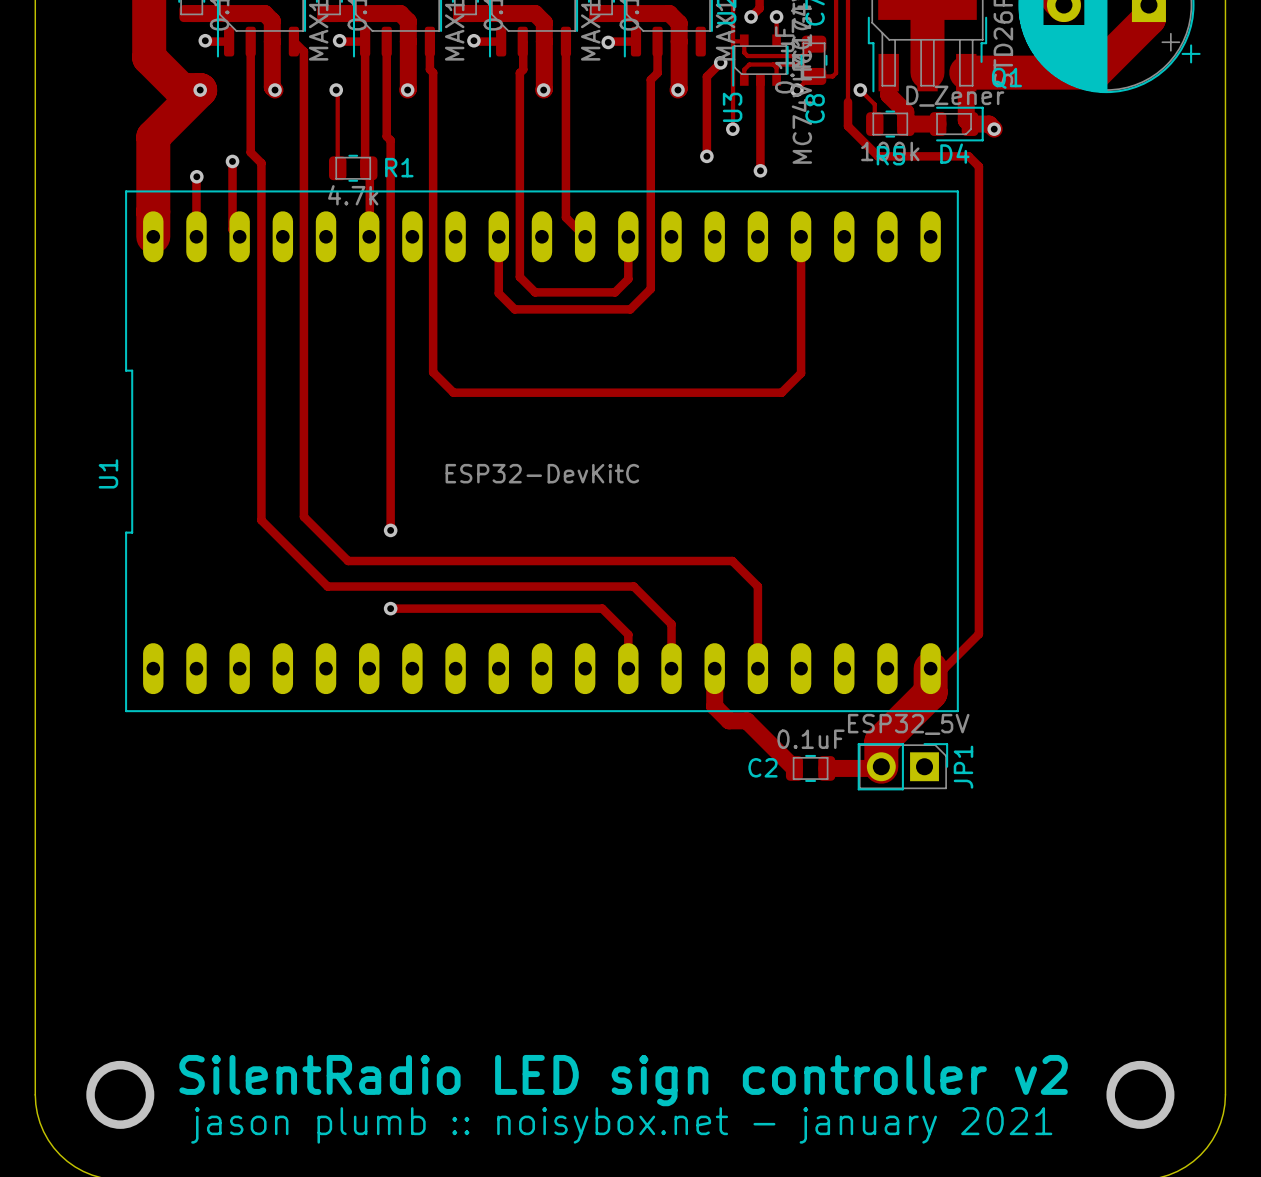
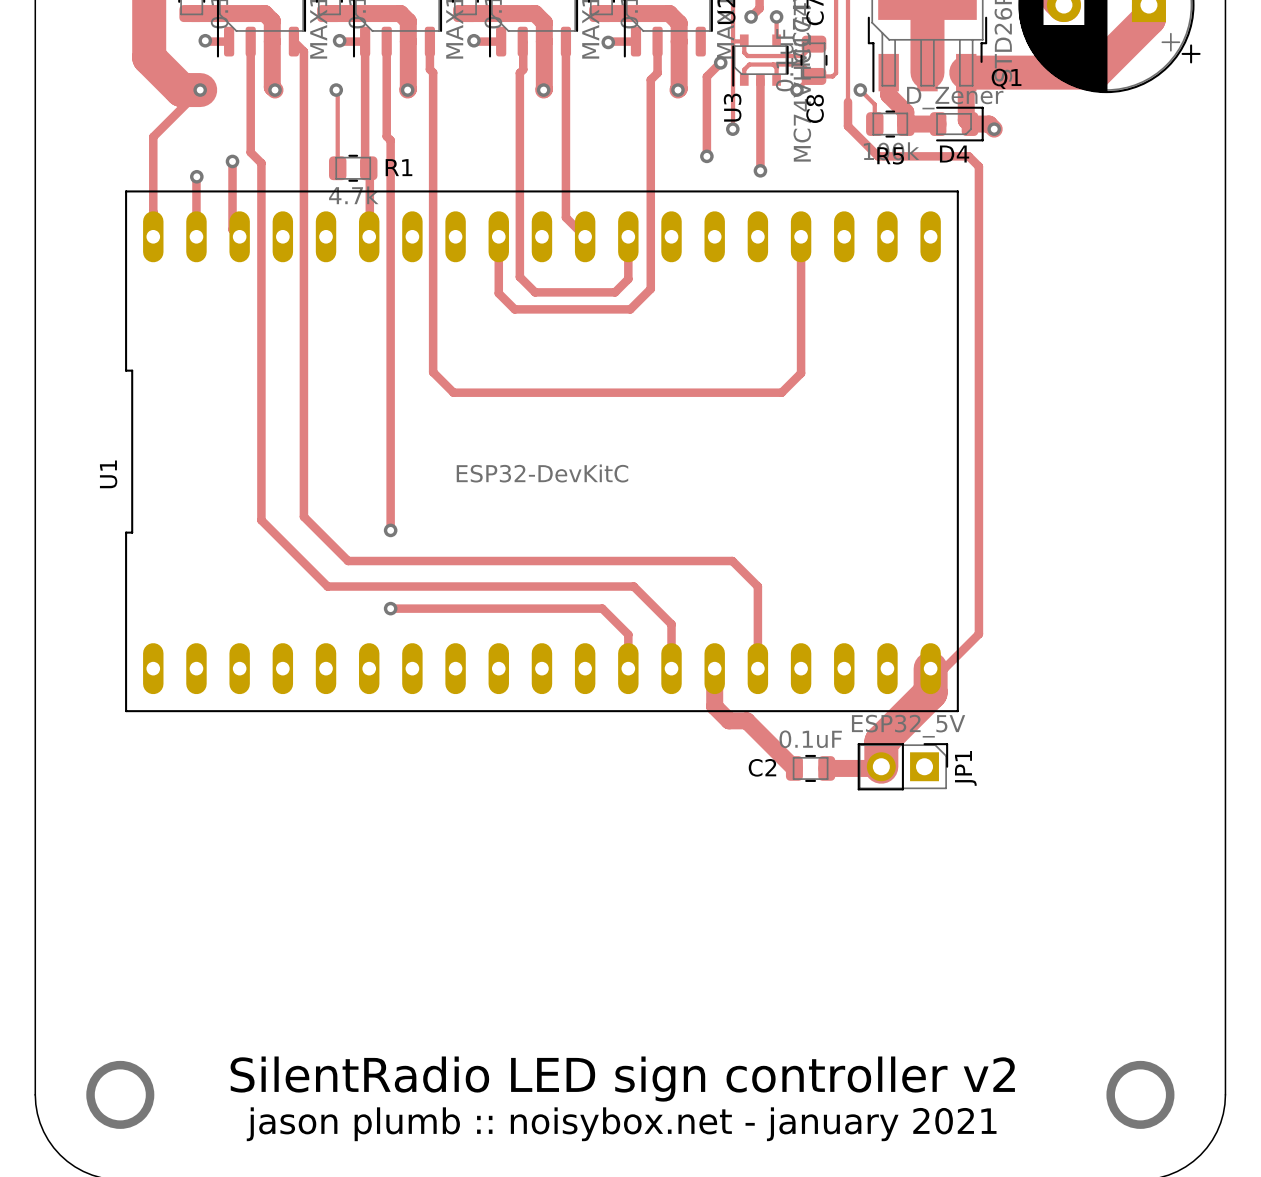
track width: thick (200, 90) (153, 136) (153, 236) -> thin (200, 90) (153, 136) (153, 236)

